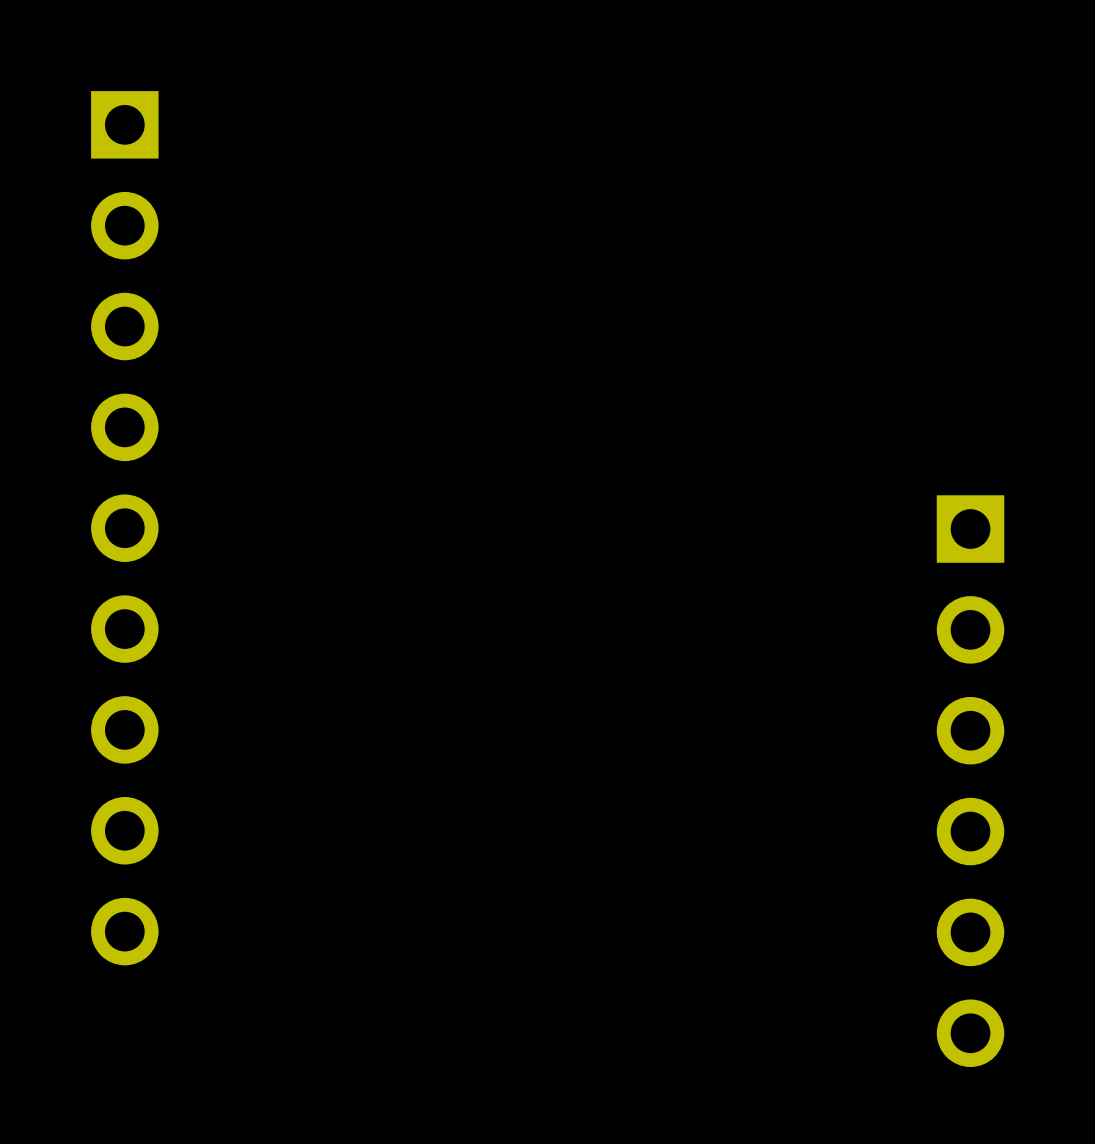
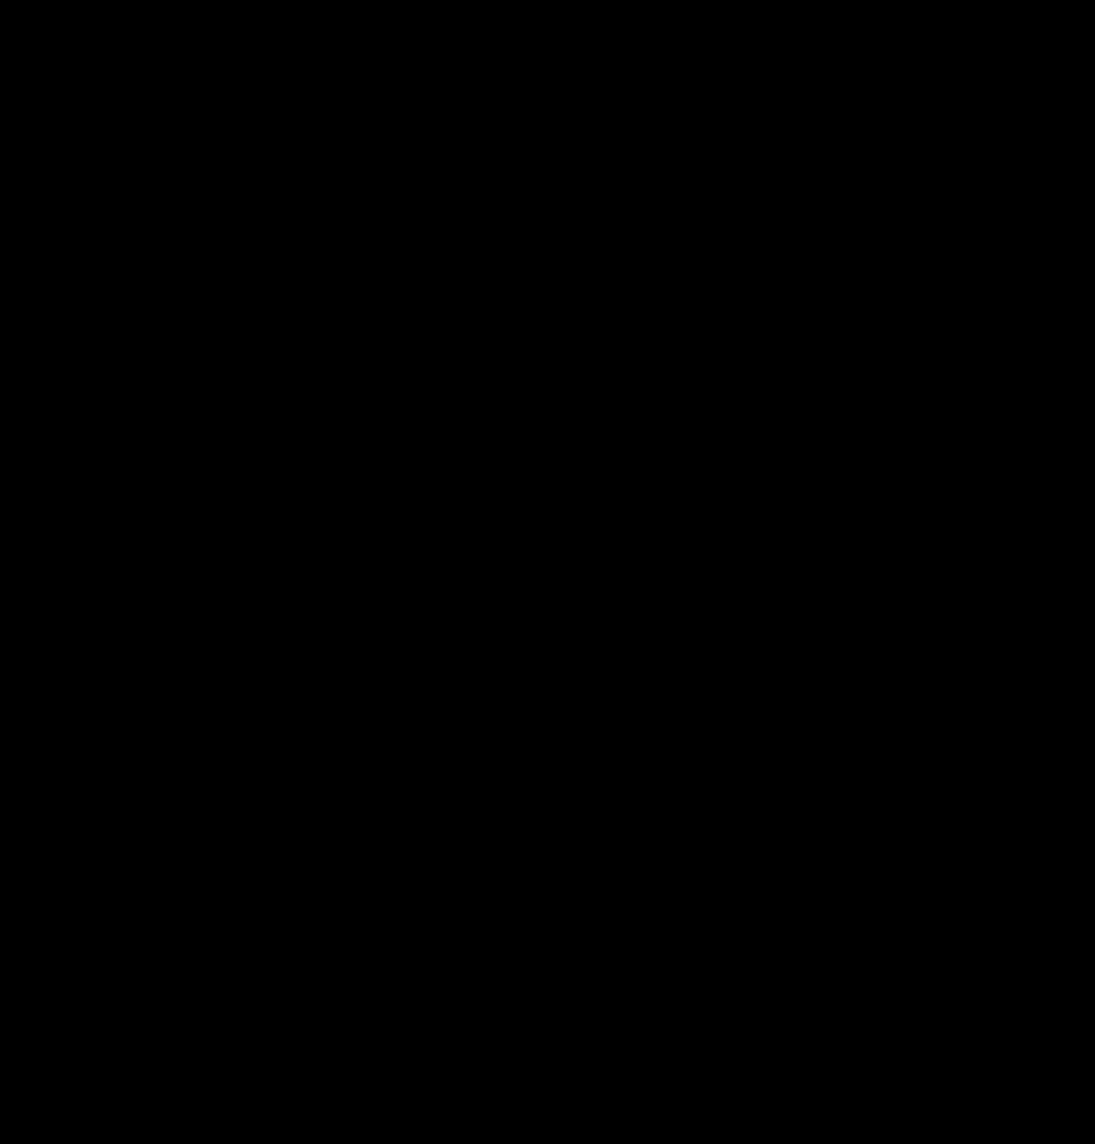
part: (124, 528) -> none
part: (970, 781) -> none

